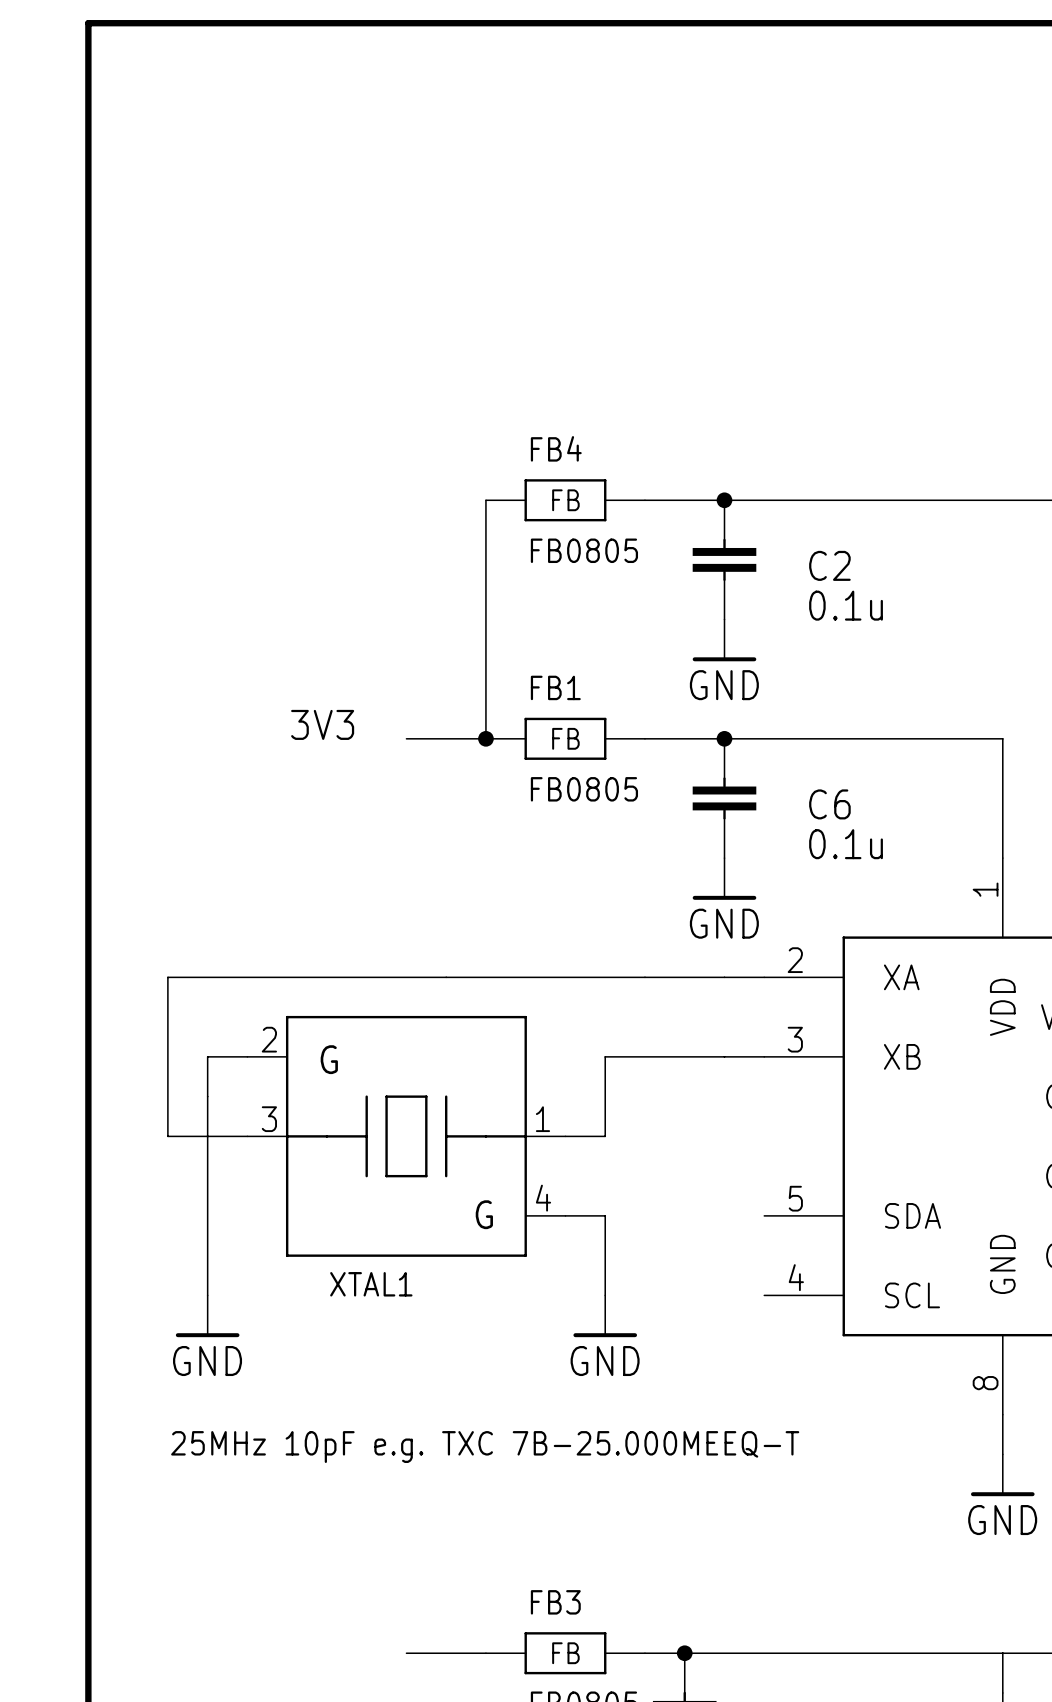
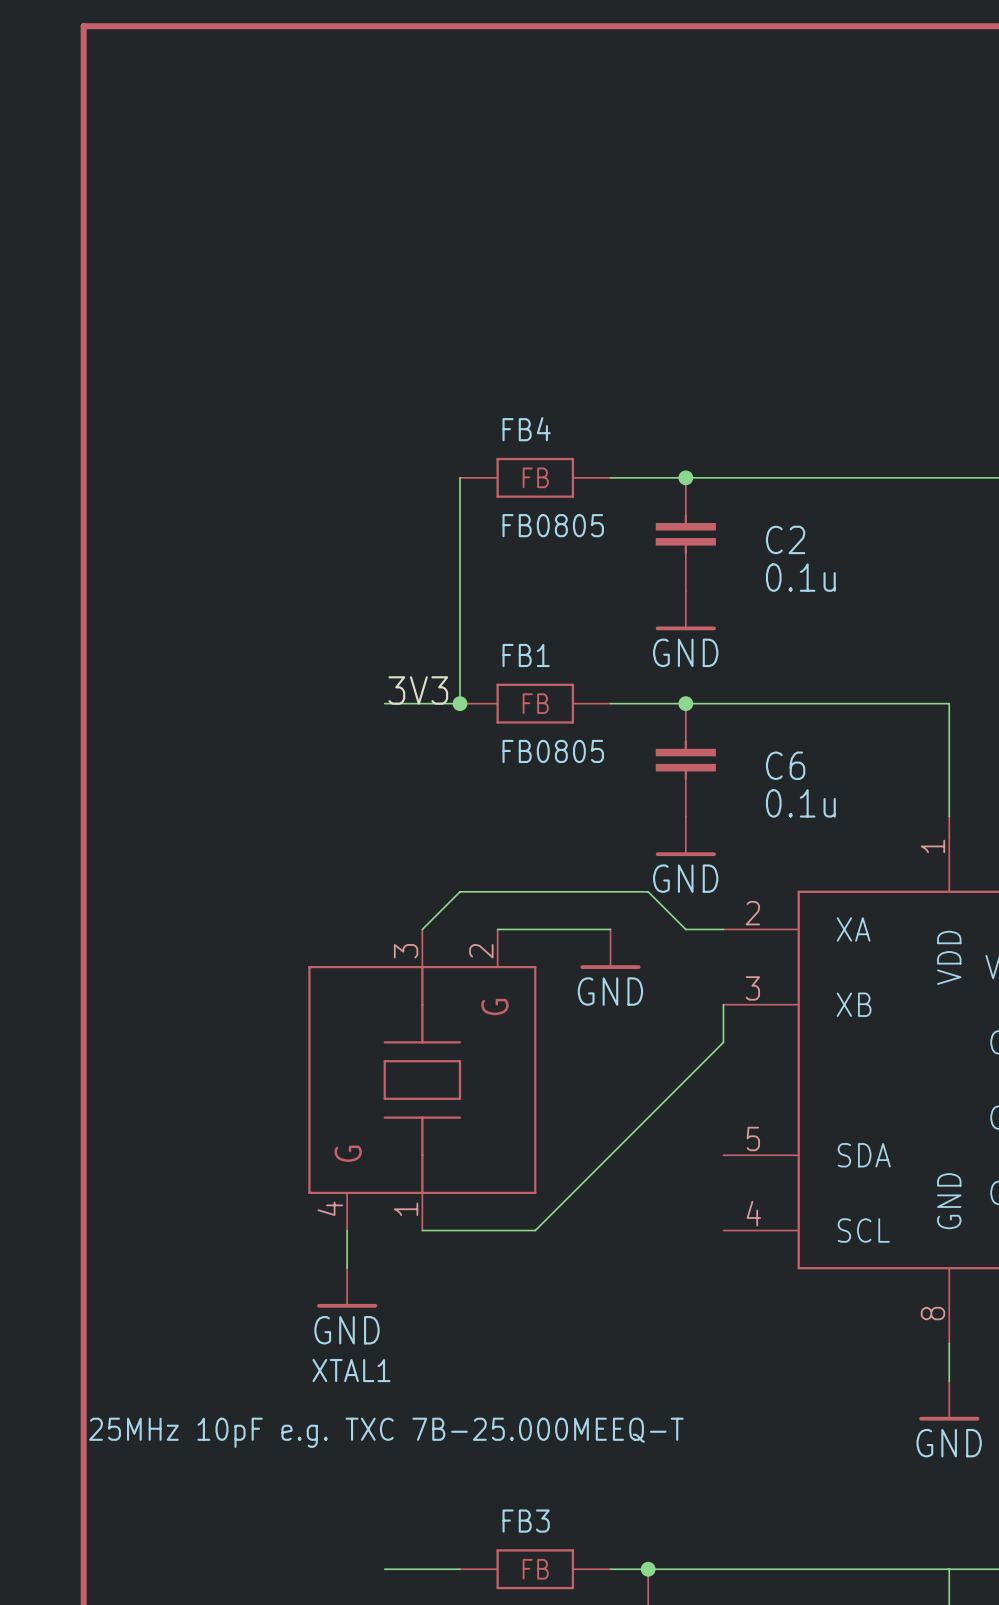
label position: 3V3 (322, 724) -> 3V3 (418, 690)
wire: (525, 977) (167, 977) (167, 1136) (247, 1136) -> none
wire: (644, 977) (724, 977) -> (422, 929) (460, 891) (648, 891) (685, 929)
power symbol: none -> GND (610, 949)
XTAL1 symbol: [247, 1015, 566, 1257] -> [308, 929, 537, 1231]
wire: (247, 1056) (207, 1056) (207, 1295) -> none
wire: (764, 1056) (605, 1056) (605, 1136) (565, 1136) -> (723, 1004) (723, 1042) (535, 1230) (422, 1230)
wire: (565, 1215) (605, 1215) (605, 1295) -> none
XTAL1 name position: XTAL1 (371, 1284) -> XTAL1 (351, 1370)
wire: none -> (347, 1230) (347, 1268)
power symbol: GND (207, 1316) -> none
power symbol: GND (605, 1316) -> none
power symbol: none -> GND (347, 1287)
XTAL1 value position: 25MHz 10pF e.g. TXC 7B-25.000MEEQ-T (485, 1447) -> 25MHz 10pF e.g. TXC 7B-25.000MEEQ-T (386, 1432)

